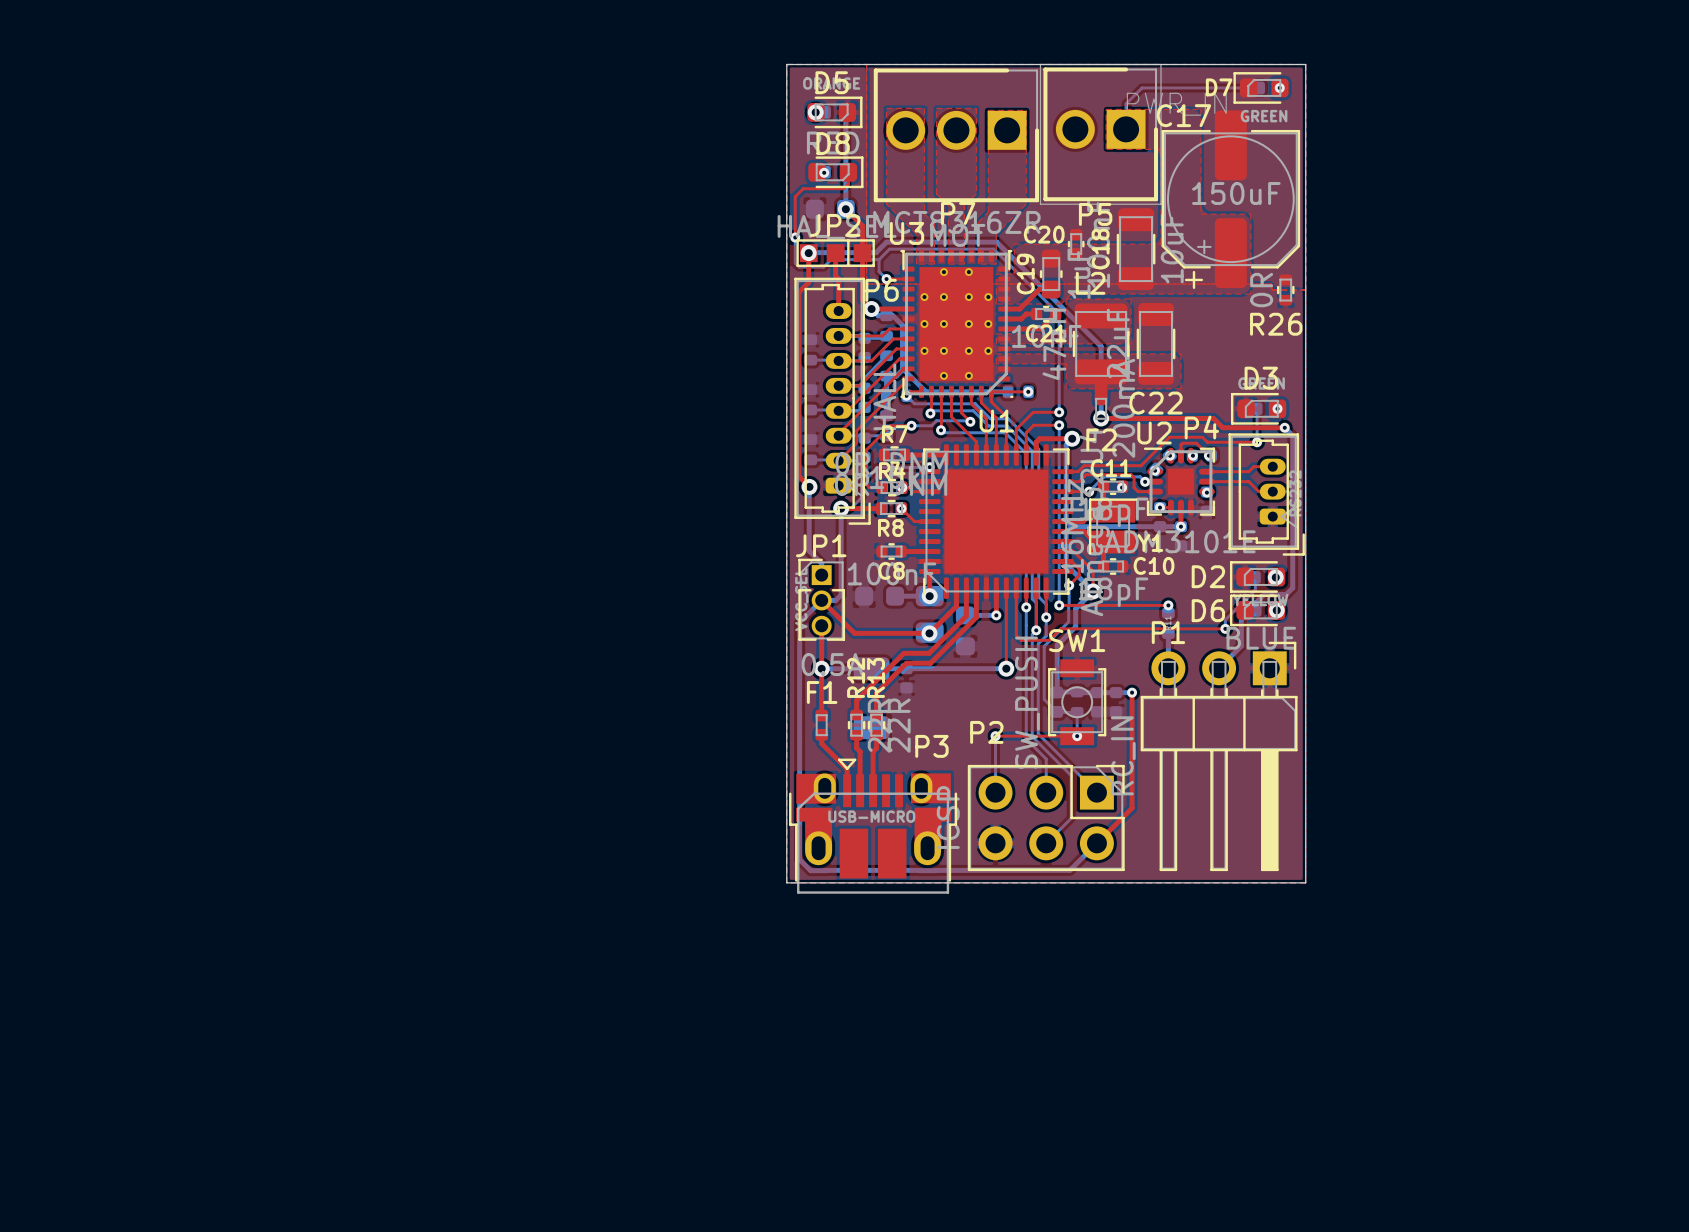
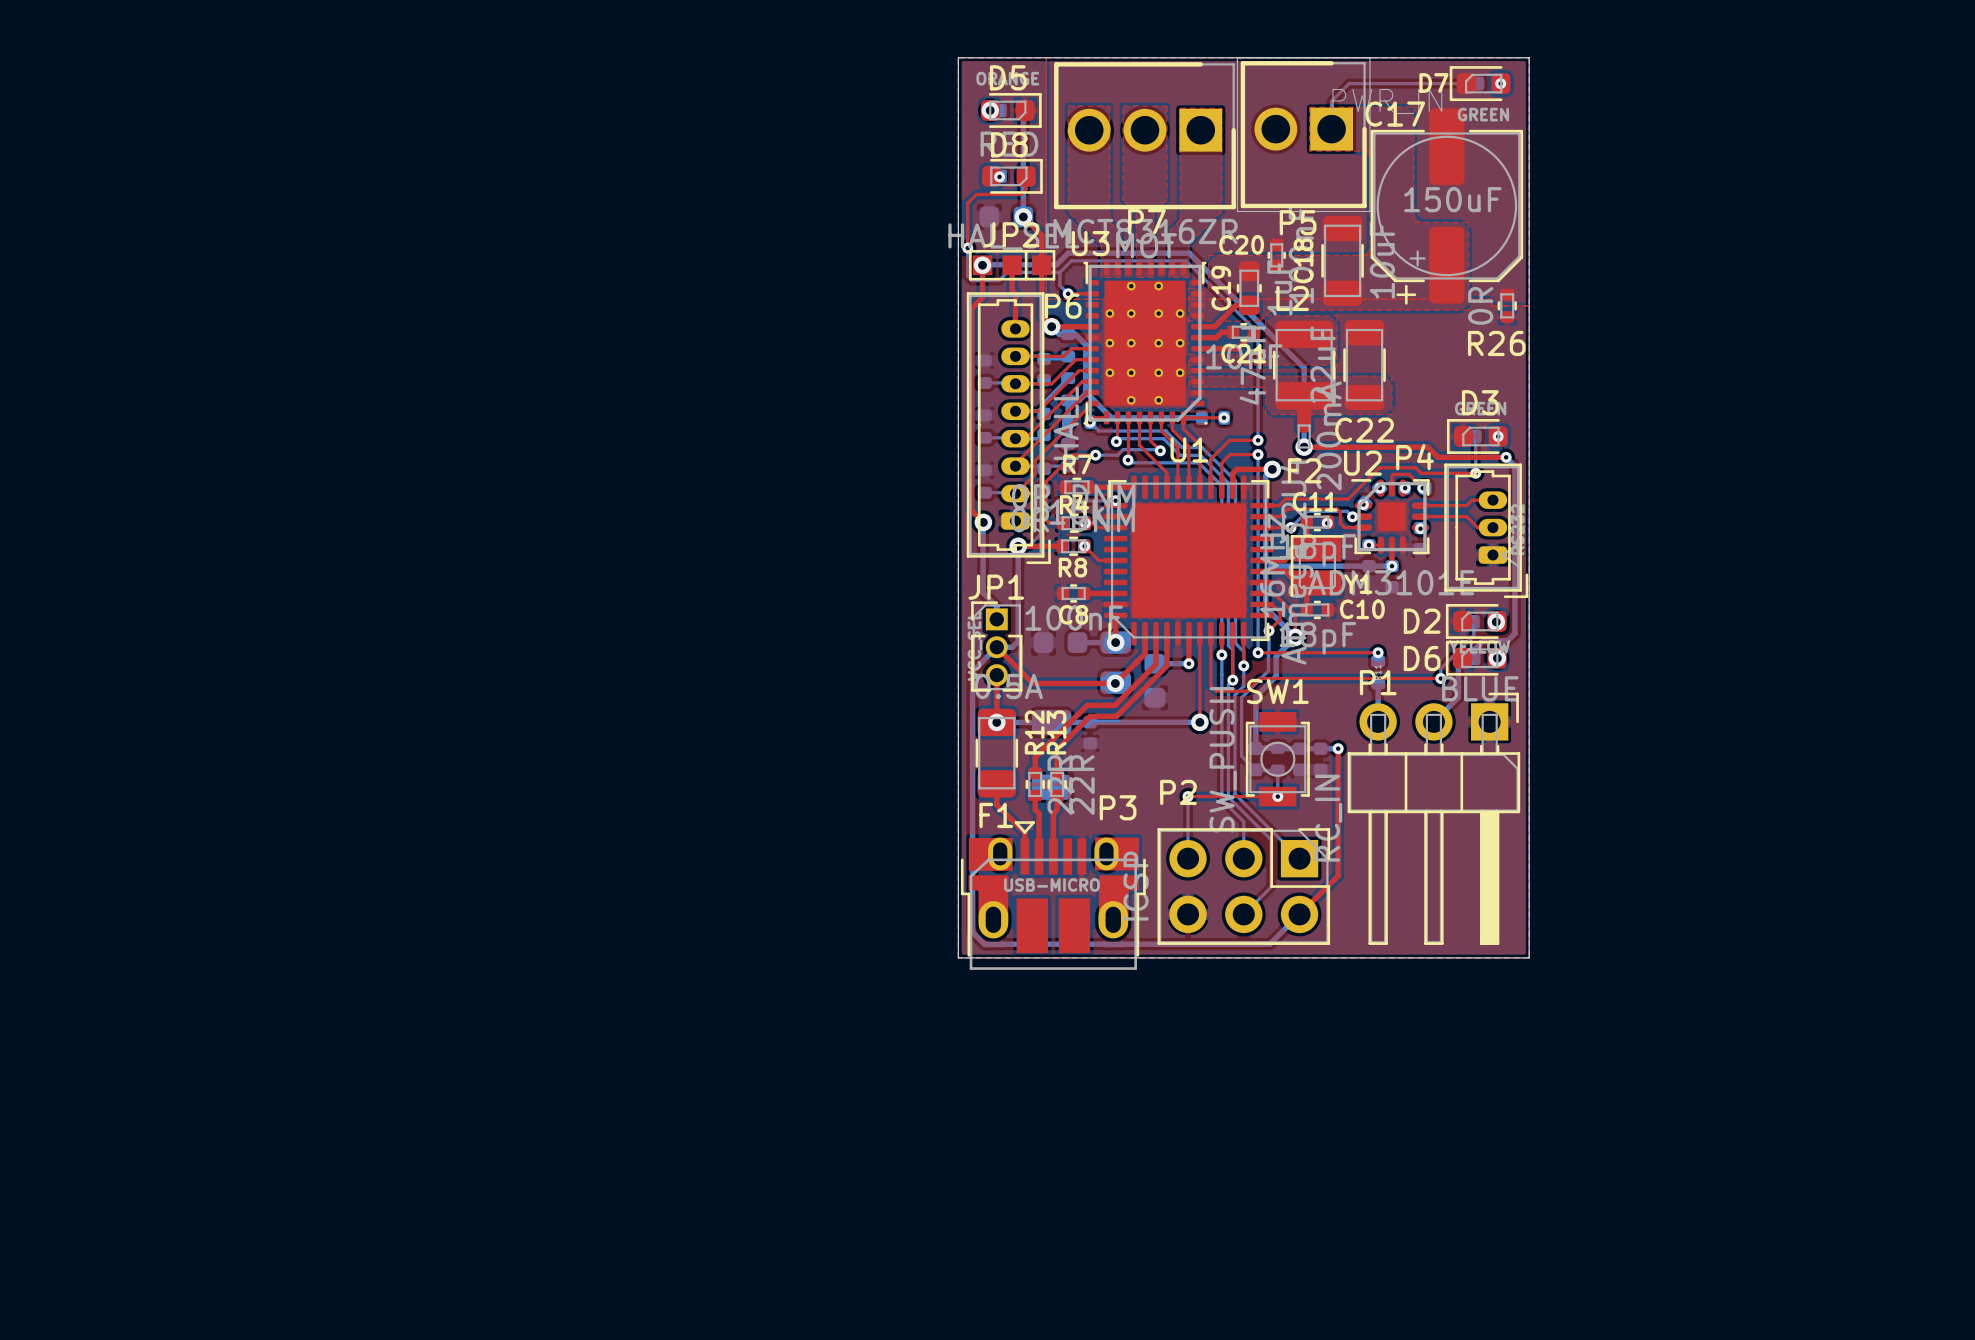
top track: (821, 668) (821, 715) -> none
F1 name position: F1 (822, 692) -> F1 (996, 815)
F1 footprint: [815, 709, 829, 741] -> [975, 708, 1019, 798]

